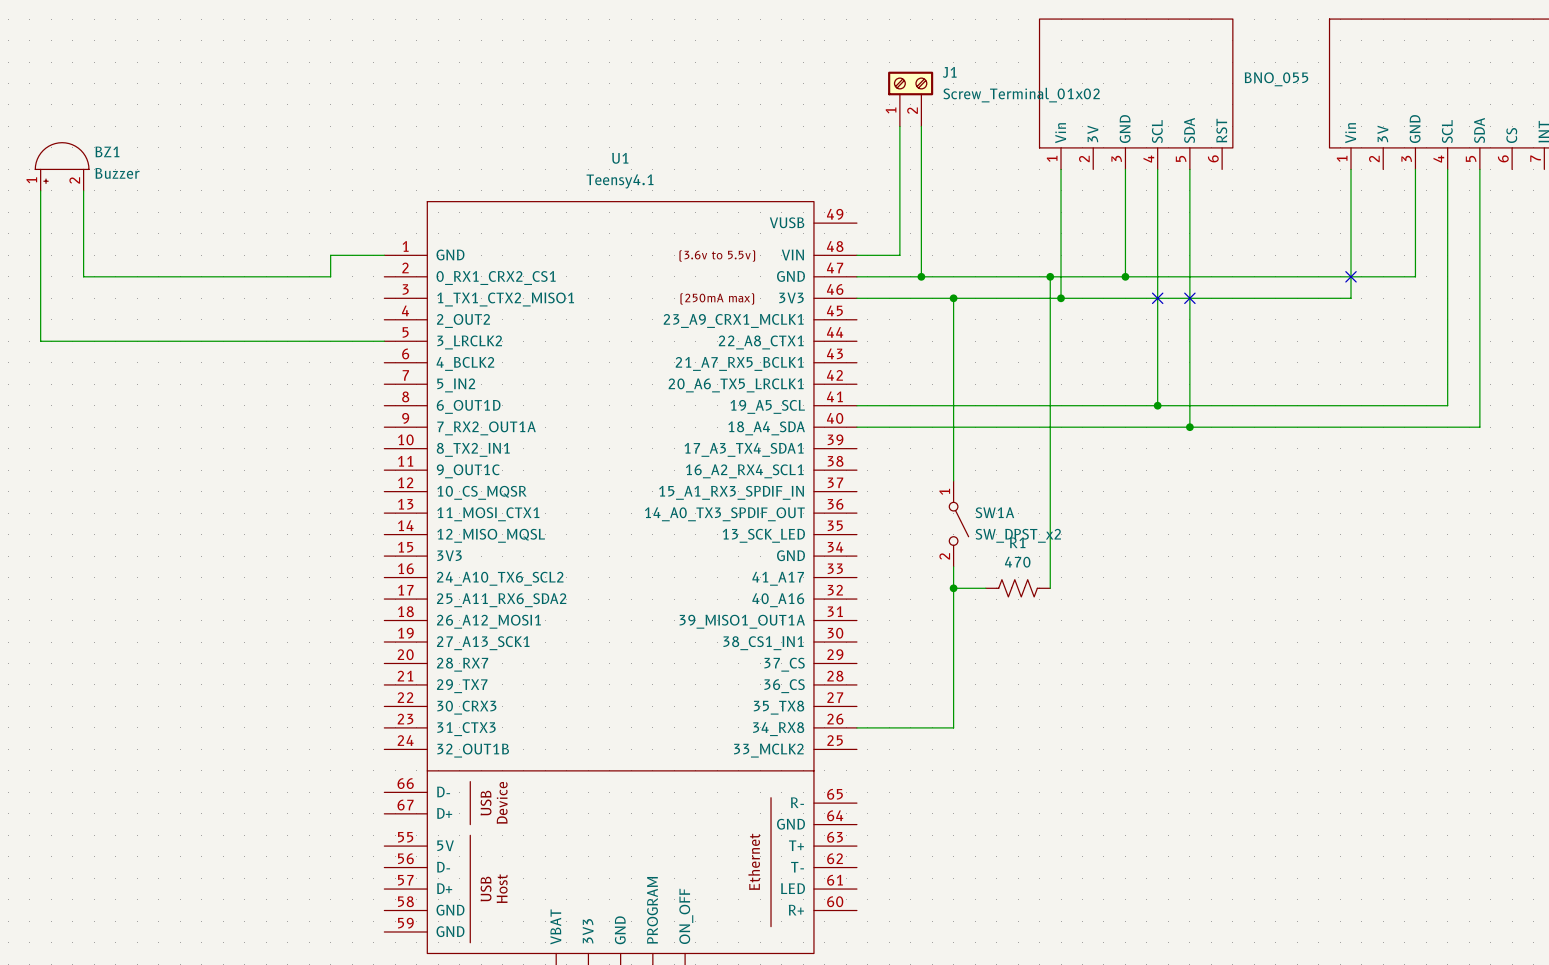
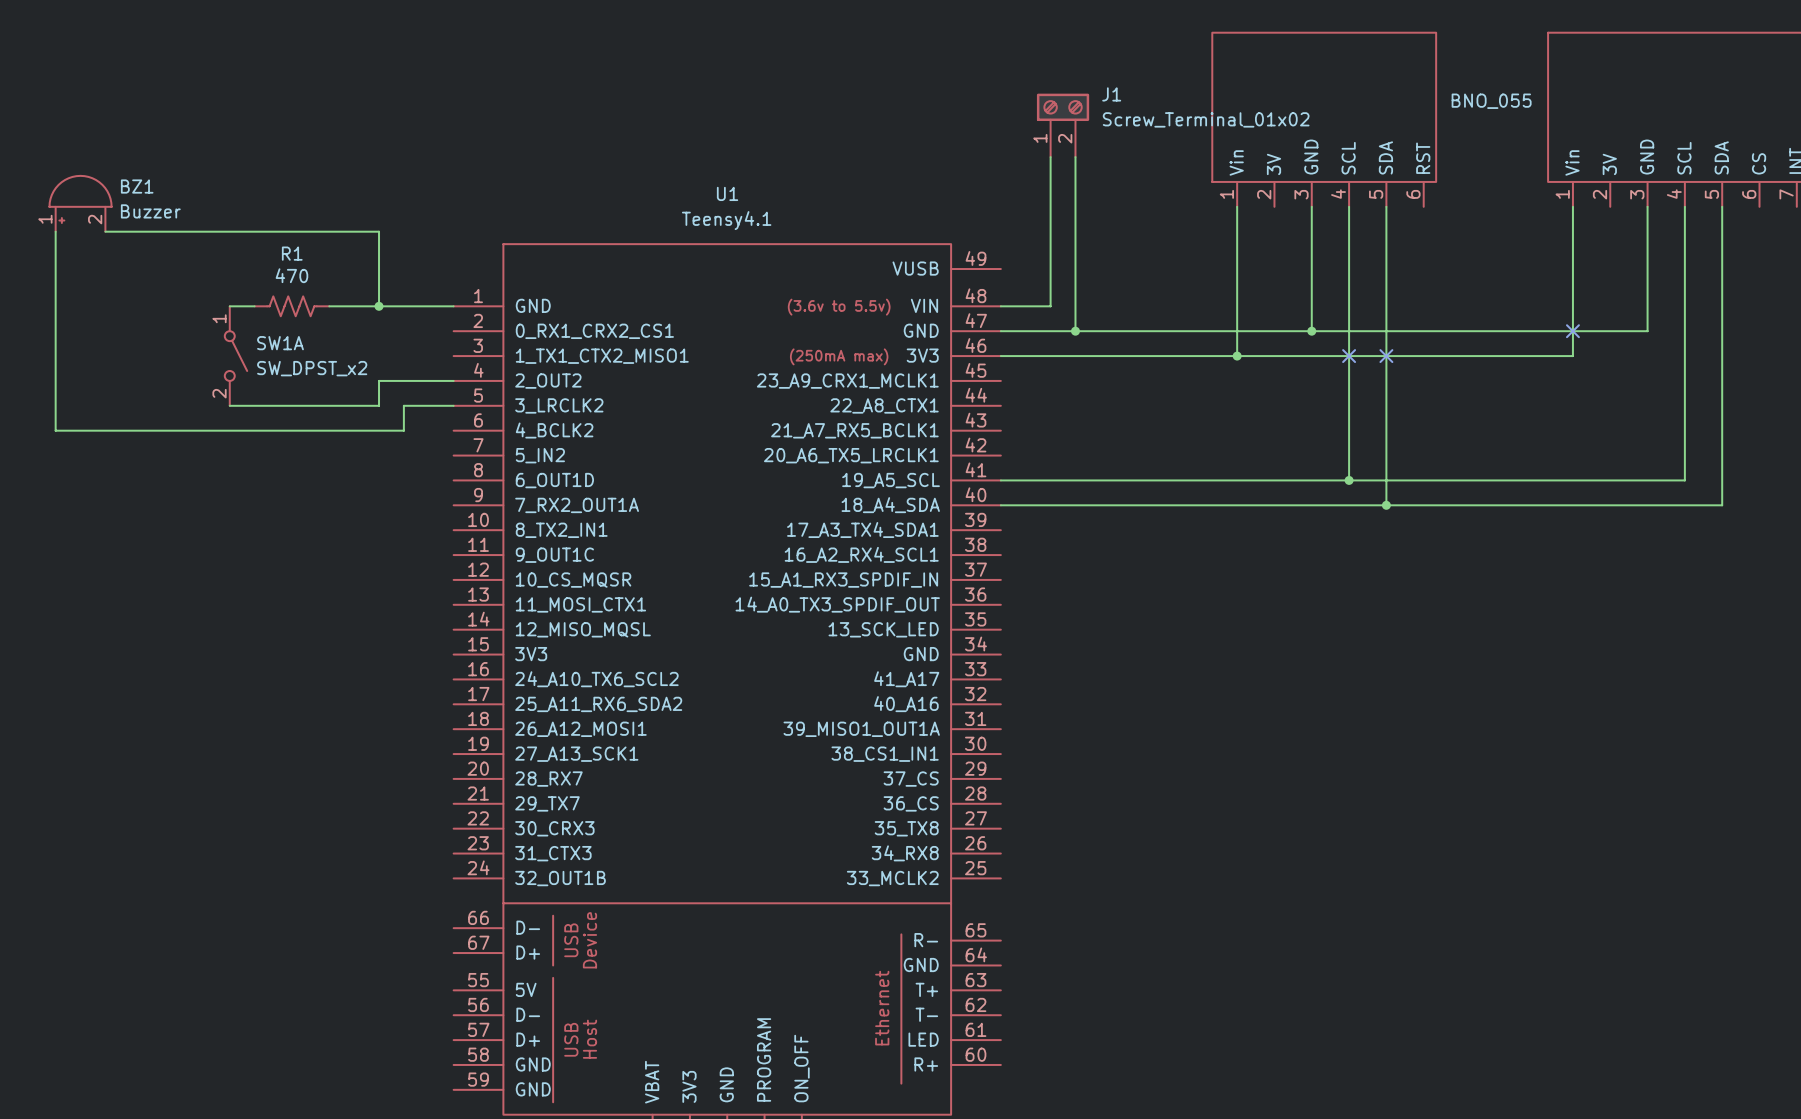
wire: (83, 190) (83, 276) (330, 276) (330, 255) -> (105, 231) (379, 231) (379, 306)
wire: none -> (229, 306) (254, 306)
wire: none -> (329, 306) (391, 306)
junction: none -> (379, 306)
wire: (1050, 276) (1050, 588) -> none
junction: (1050, 276) -> none
wire: (953, 298) (953, 480) -> none
junction: (953, 298) -> none
wire: (40, 341) (191, 341) -> (55, 405) (55, 430) (403, 430) (403, 405)
wire: (319, 341) (341, 341) -> (379, 405) (379, 380) (453, 380)
SW1A position: (958, 523) -> (235, 356)
wire: (953, 566) (953, 727) (856, 727) -> none
wire: (953, 588) (985, 588) -> none
junction: (953, 588) -> none
R1 position: (1018, 588) -> (291, 306)

